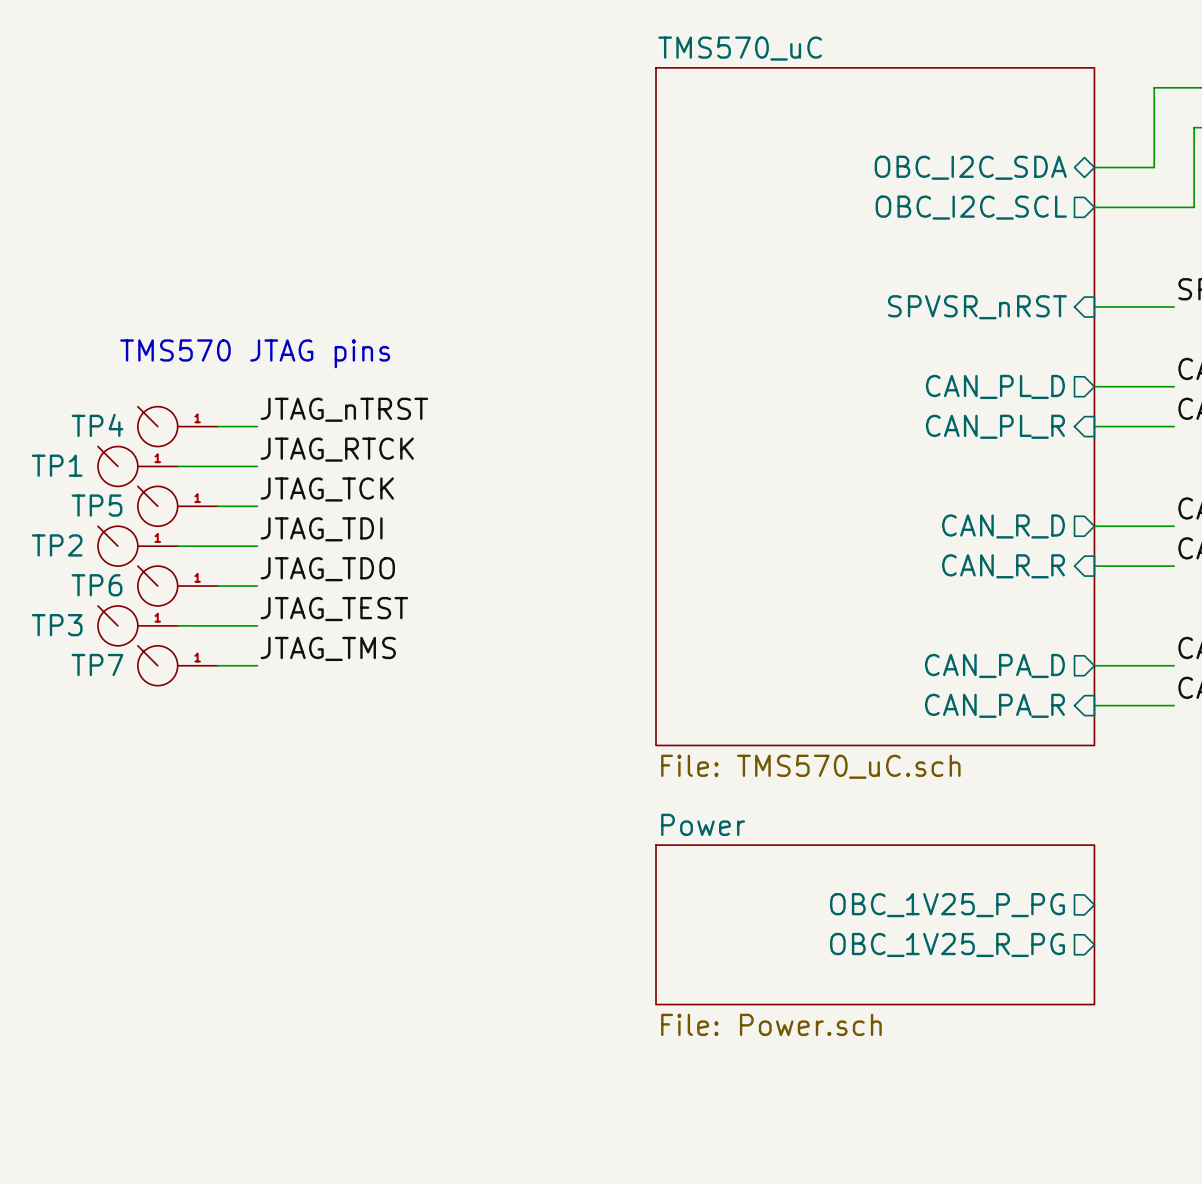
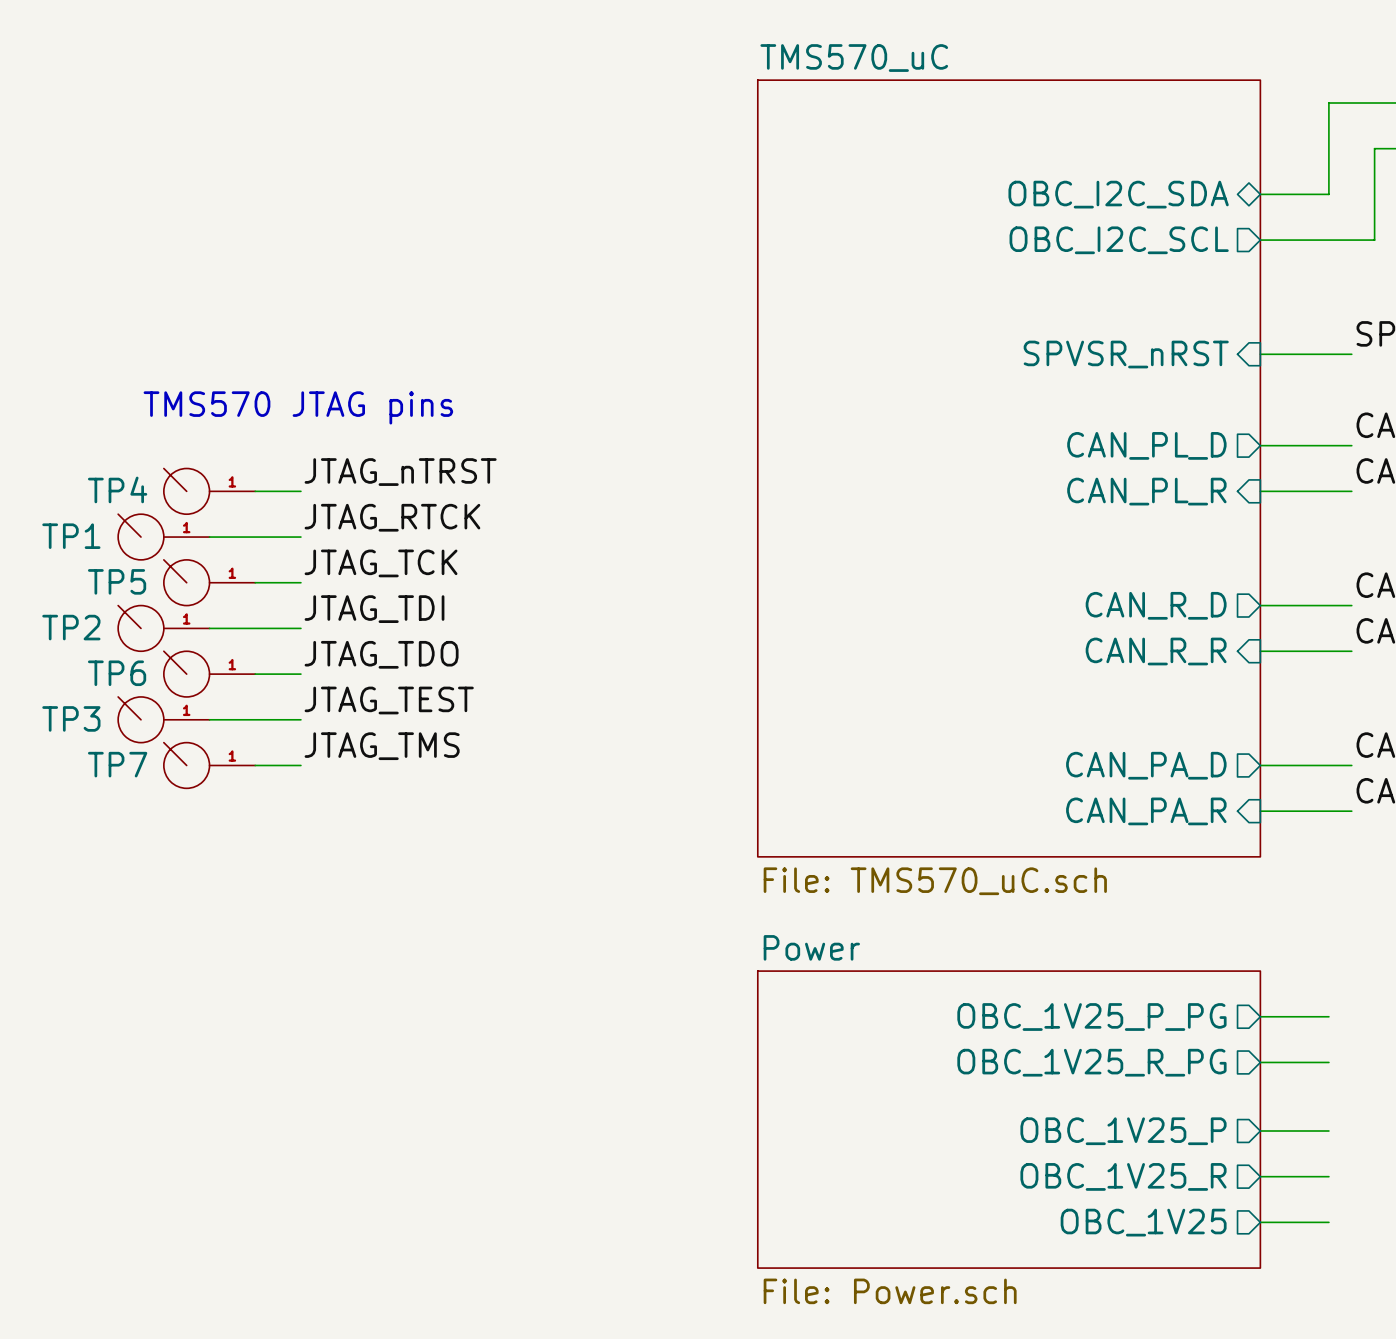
wire: none -> (1260, 1016) (1328, 1016)
sheet pin position: OBC_1V25_P_PG (947, 905) -> OBC_1V25_P_PG (1091, 1017)
sheet Power: File: Power.sch (875, 924) -> none
wire: none -> (1260, 1062) (1328, 1062)
sheet pin position: OBC_1V25_R_PG (947, 944) -> OBC_1V25_R_PG (1091, 1062)
sheet Power: none -> File: Power.sch (1009, 1119)
sheet pin: none -> OBC_1V25_P (1123, 1131)
wire: none -> (1260, 1130) (1328, 1130)
sheet pin: none -> OBC_1V25_R (1123, 1176)
wire: none -> (1260, 1176) (1328, 1176)
sheet pin: none -> OBC_1V25 (1143, 1222)
wire: none -> (1260, 1222) (1328, 1222)

